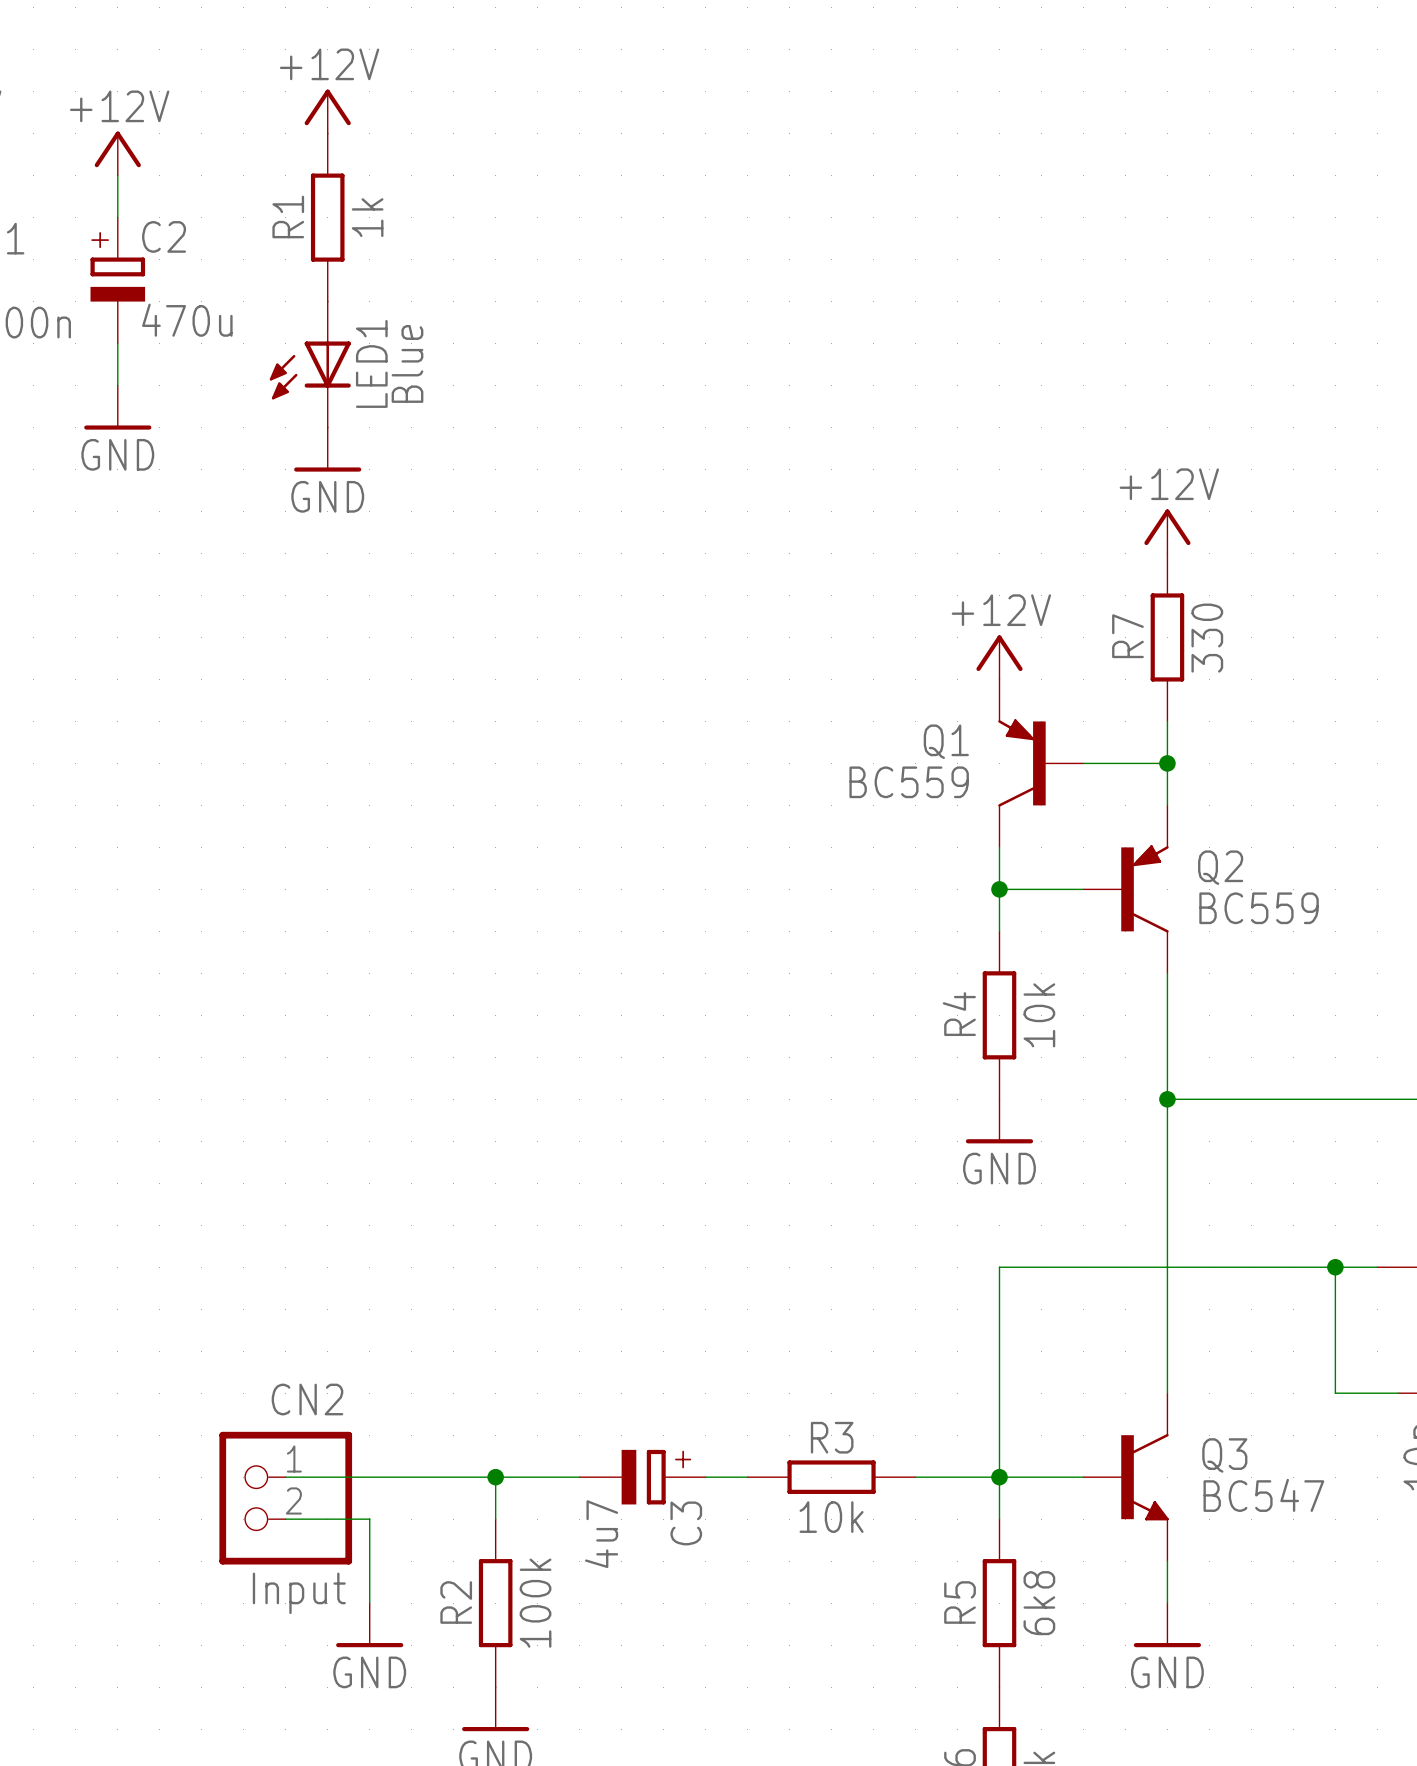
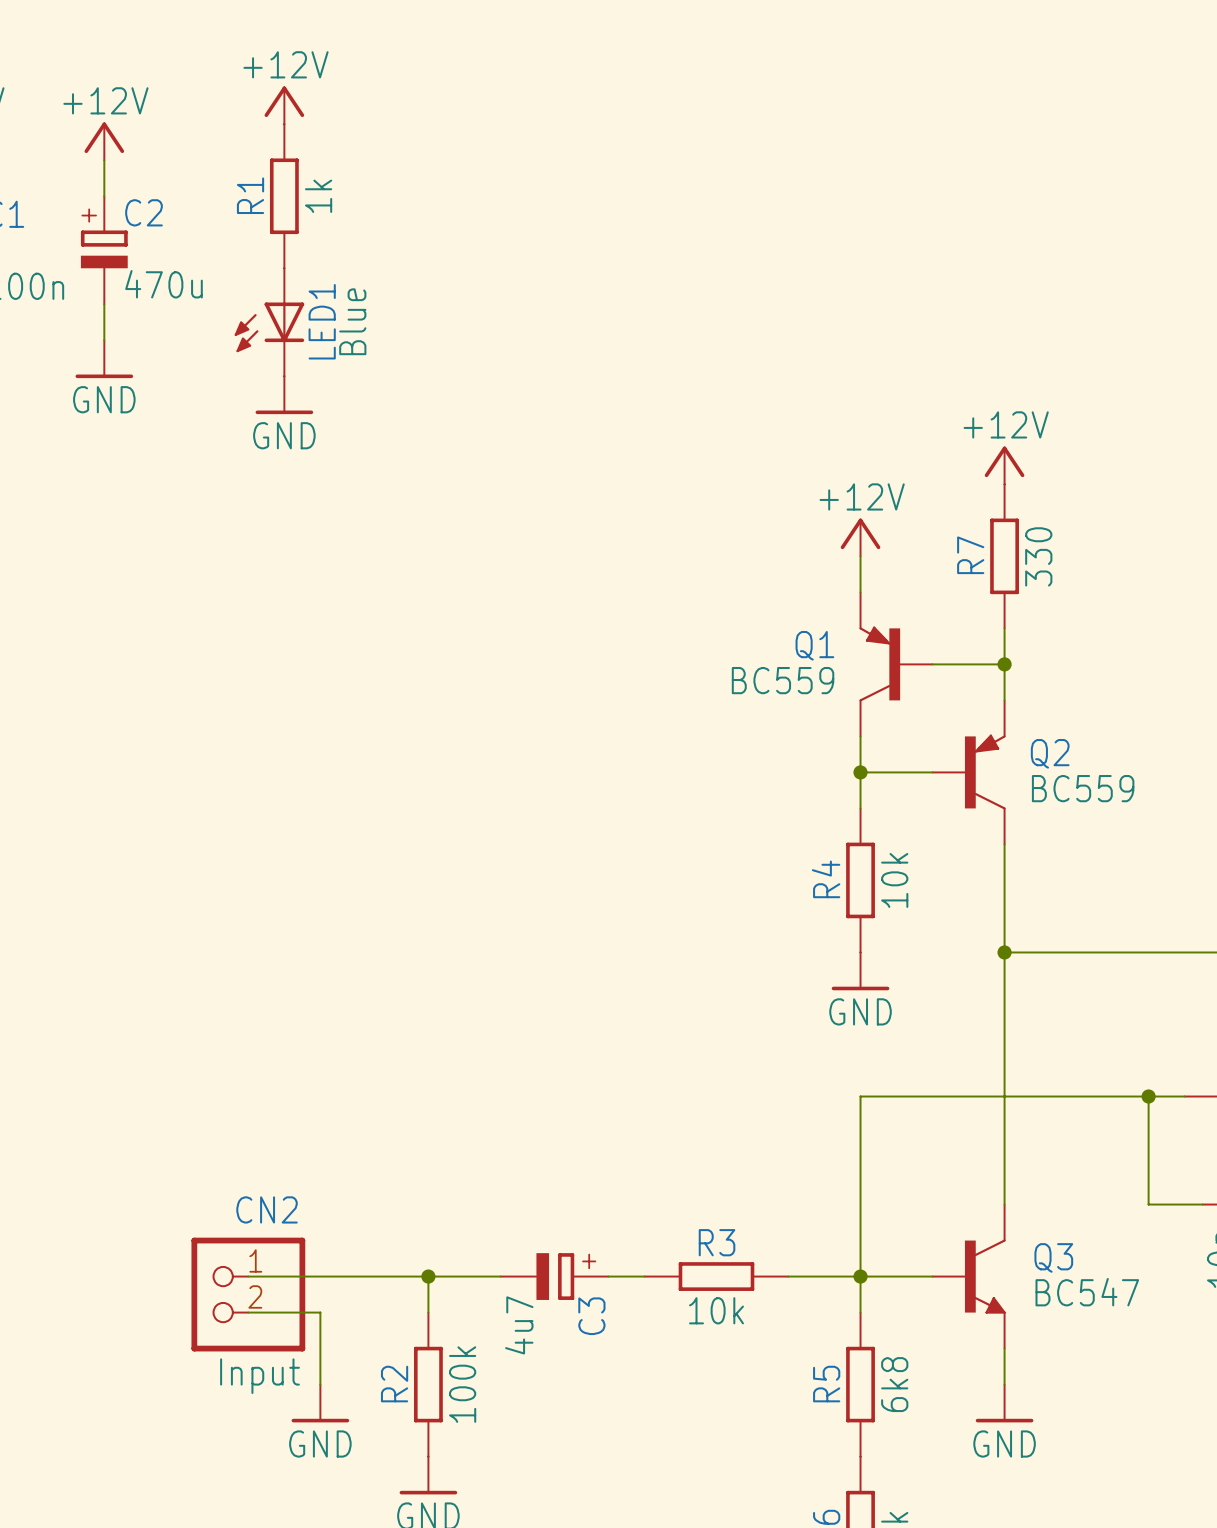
power symbol position: +12V (999, 657) -> +12V (860, 537)

